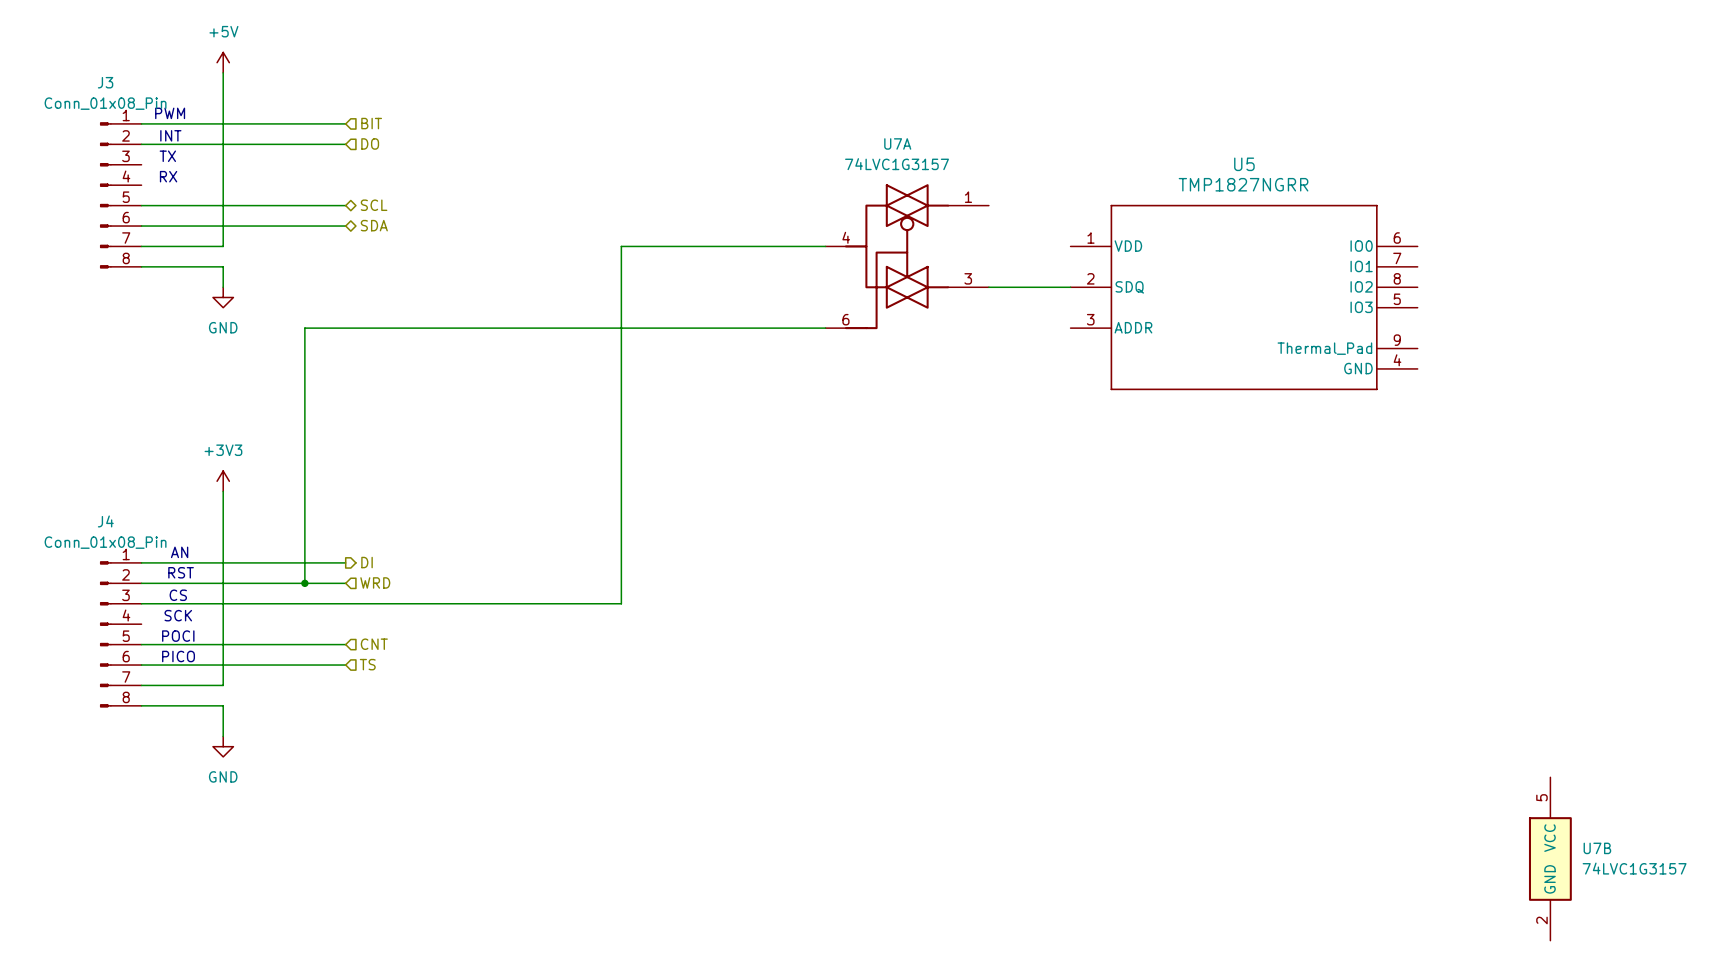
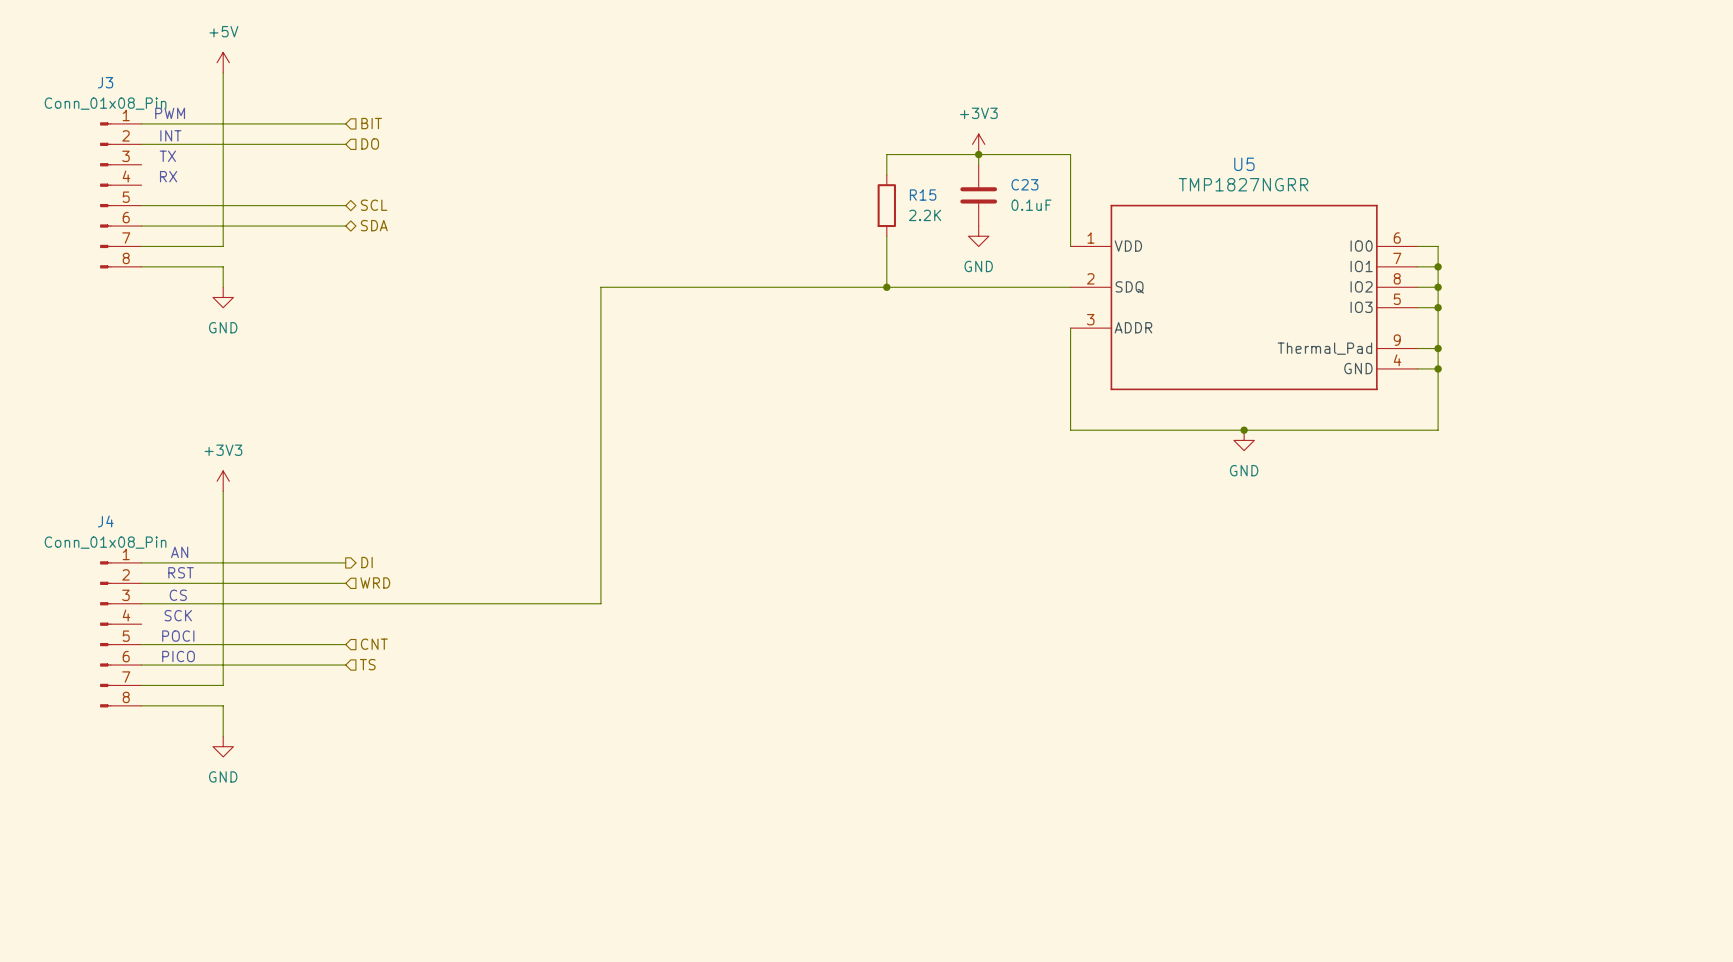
power symbol: none -> +3V3 (978, 144)
wire: none -> (978, 154) (978, 164)
junction: none -> (978, 154)
wire: none -> (886, 174) (886, 154) (1070, 154) (1070, 246)
C23: none -> 0.1uF (978, 195)
R15: none -> 2.2K (886, 205)
wire: none -> (886, 236) (886, 287)
power symbol: none -> GND (978, 236)
wire: (825, 246) (621, 246) (621, 603) (600, 603) -> (988, 287) (600, 287) (600, 603)
wire: none -> (1417, 246) (1438, 246) (1438, 430) (1070, 430) (1070, 328)
U7A: 74LVC1G3157 (907, 256) -> none
wire: none -> (1417, 266) (1438, 266)
junction: none -> (1438, 266)
junction: none -> (886, 287)
wire: none -> (1417, 287) (1438, 287)
junction: none -> (1438, 287)
wire: none -> (1417, 307) (1438, 307)
junction: none -> (1438, 307)
wire: (825, 328) (304, 328) (304, 583) -> none
wire: none -> (1417, 348) (1438, 348)
junction: none -> (1438, 348)
wire: none -> (1417, 368) (1438, 368)
junction: none -> (1438, 368)
junction: none -> (1244, 430)
power symbol: none -> GND (1244, 440)
junction: (304, 583) -> none
U7B: 74LVC1G3157 (1550, 858) -> none

